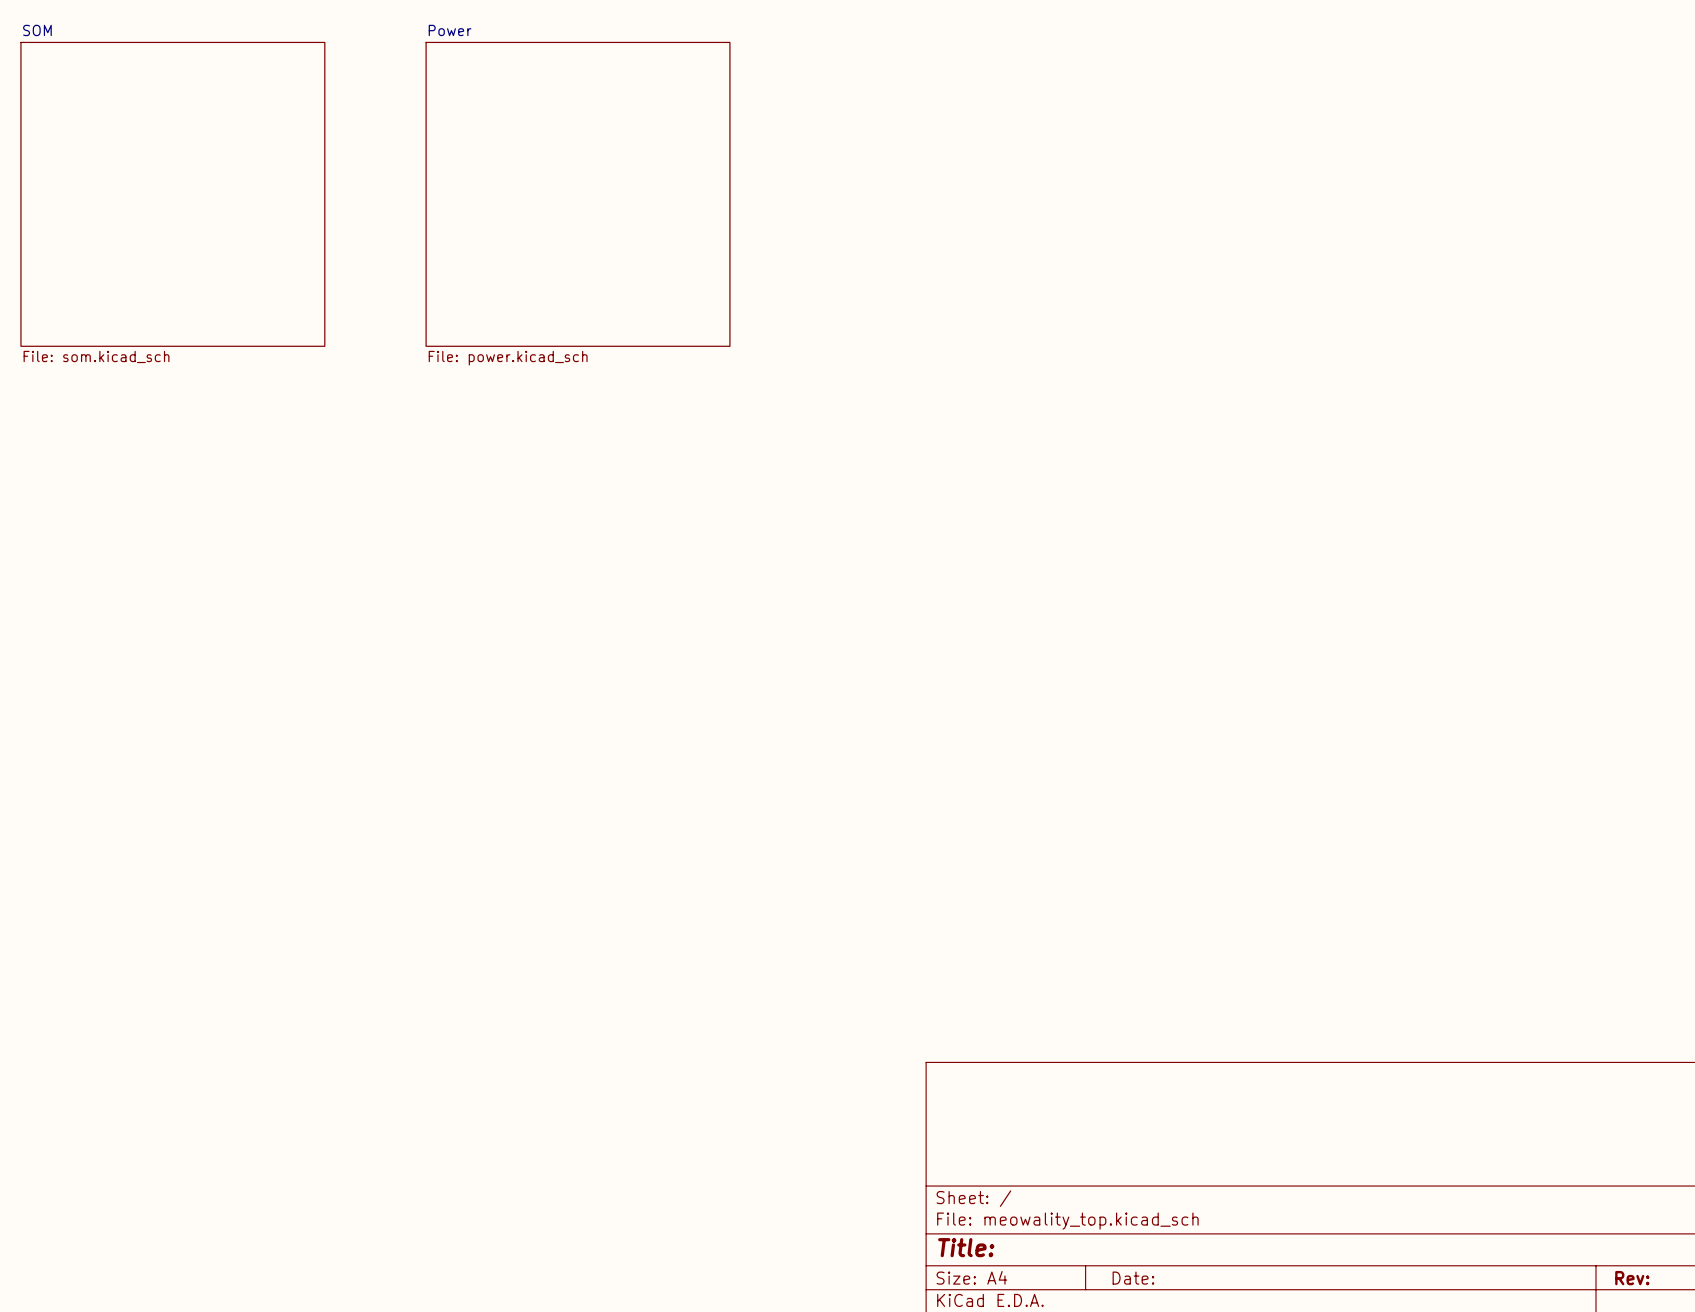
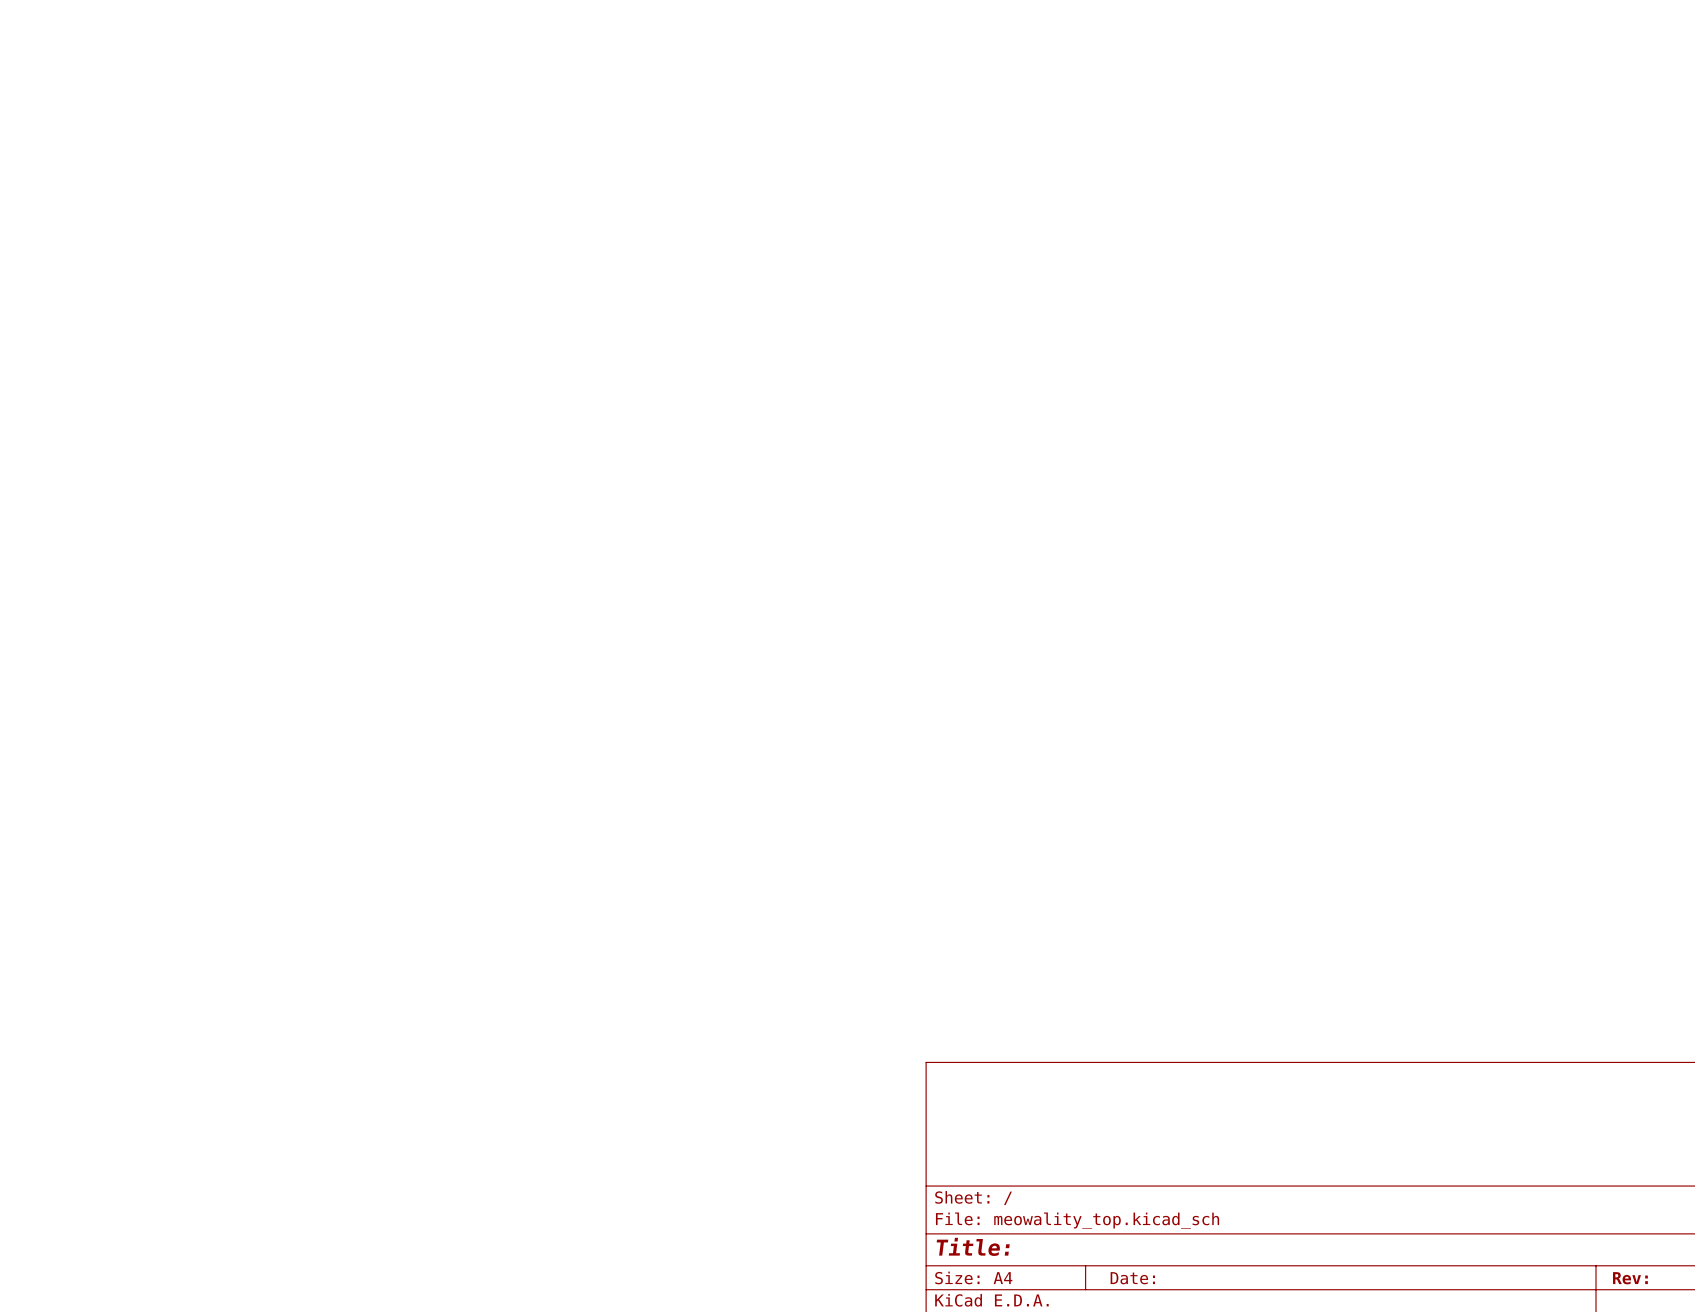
sheet SOM: File: som.kicad_sch (172, 194) -> none
sheet Power: File: power.kicad_sch (578, 194) -> none

